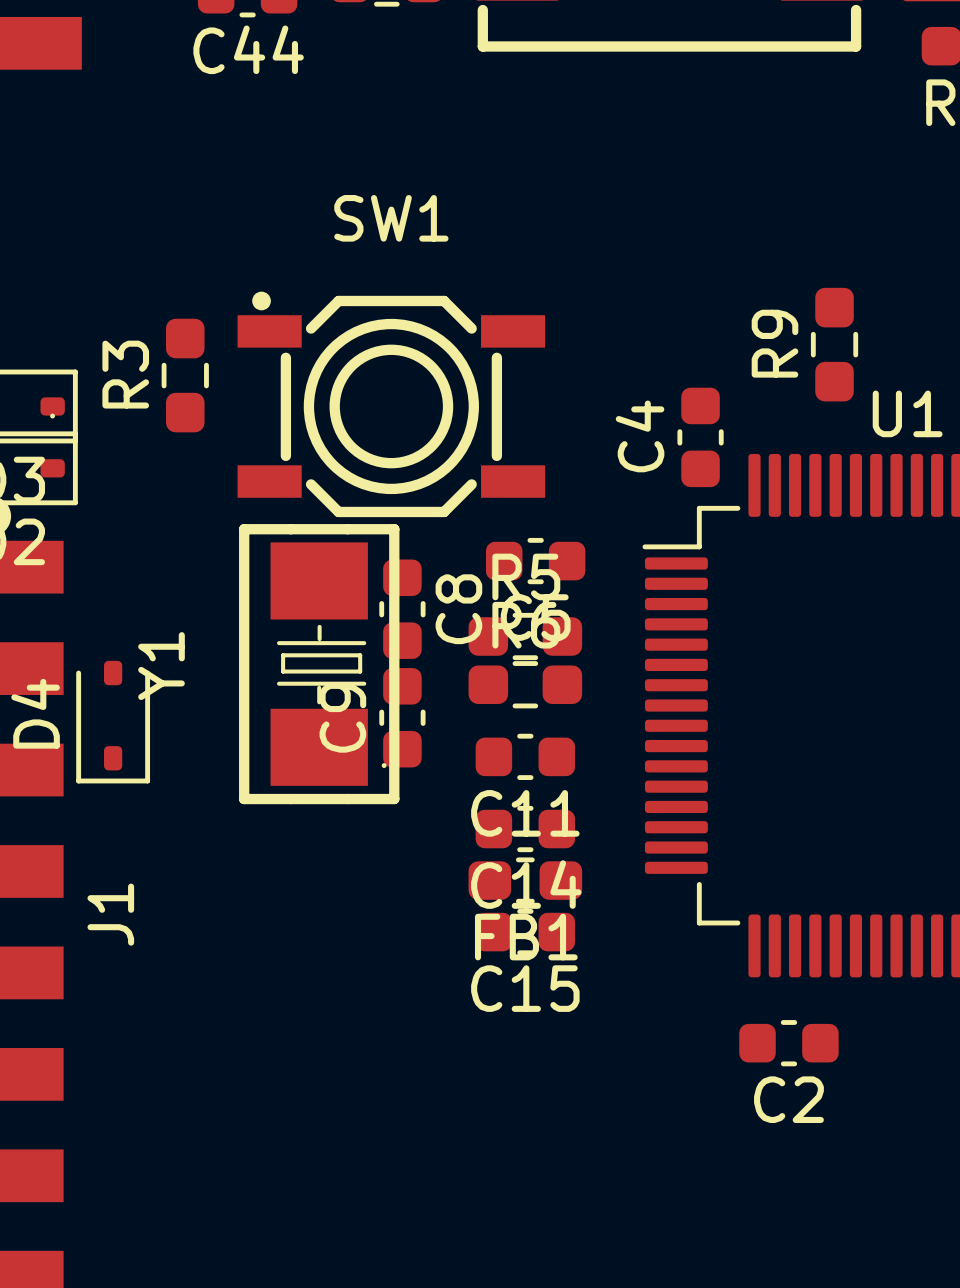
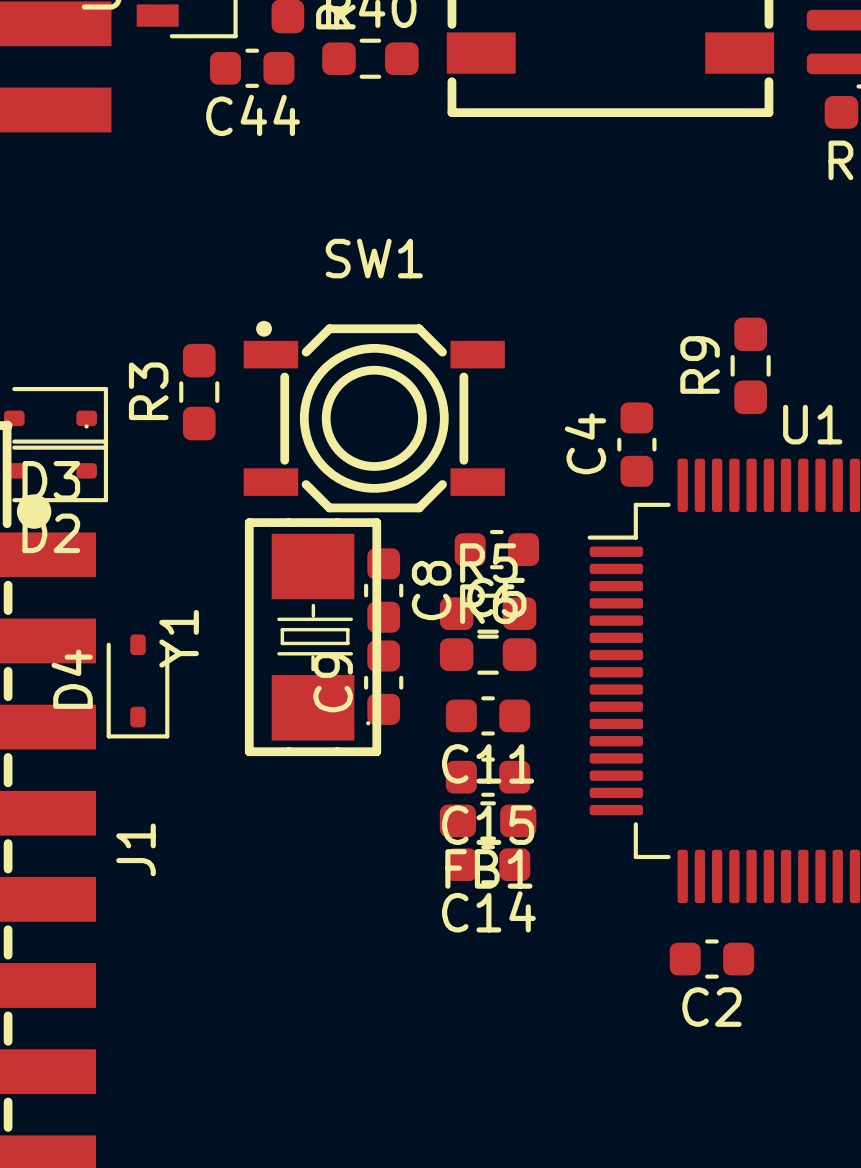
C14 name: C14 (526, 884) -> C15 (488, 825)
C15 name: C15 (525, 988) -> C14 (488, 911)

